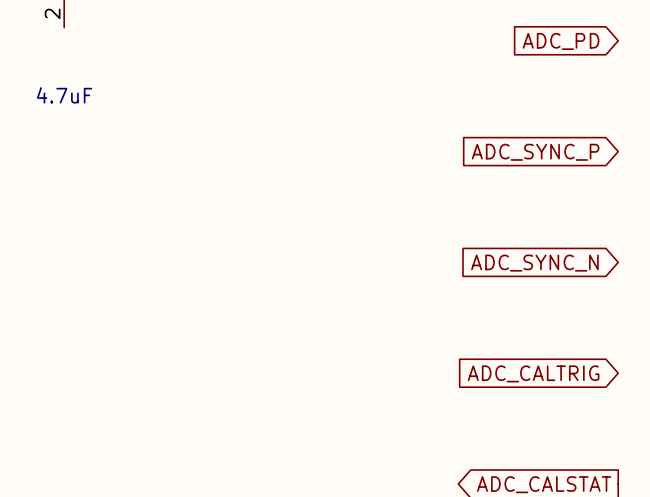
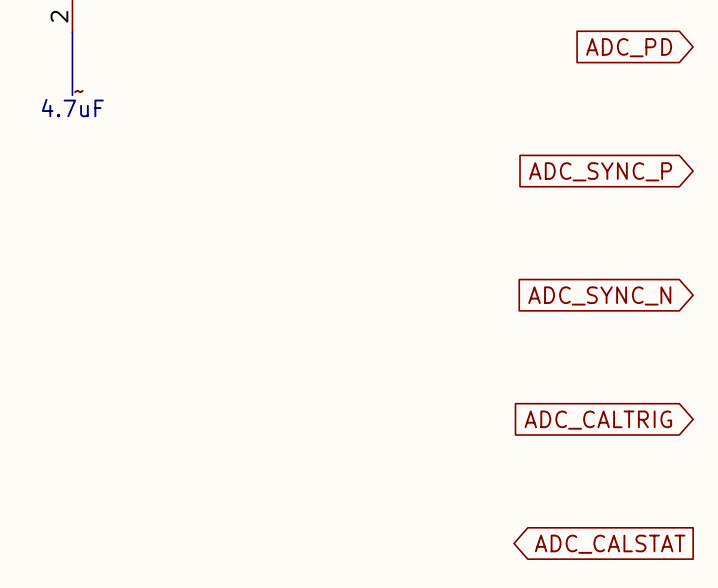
wire: none -> (72, 32) (72, 95)
label: none -> ~ (78, 91)

